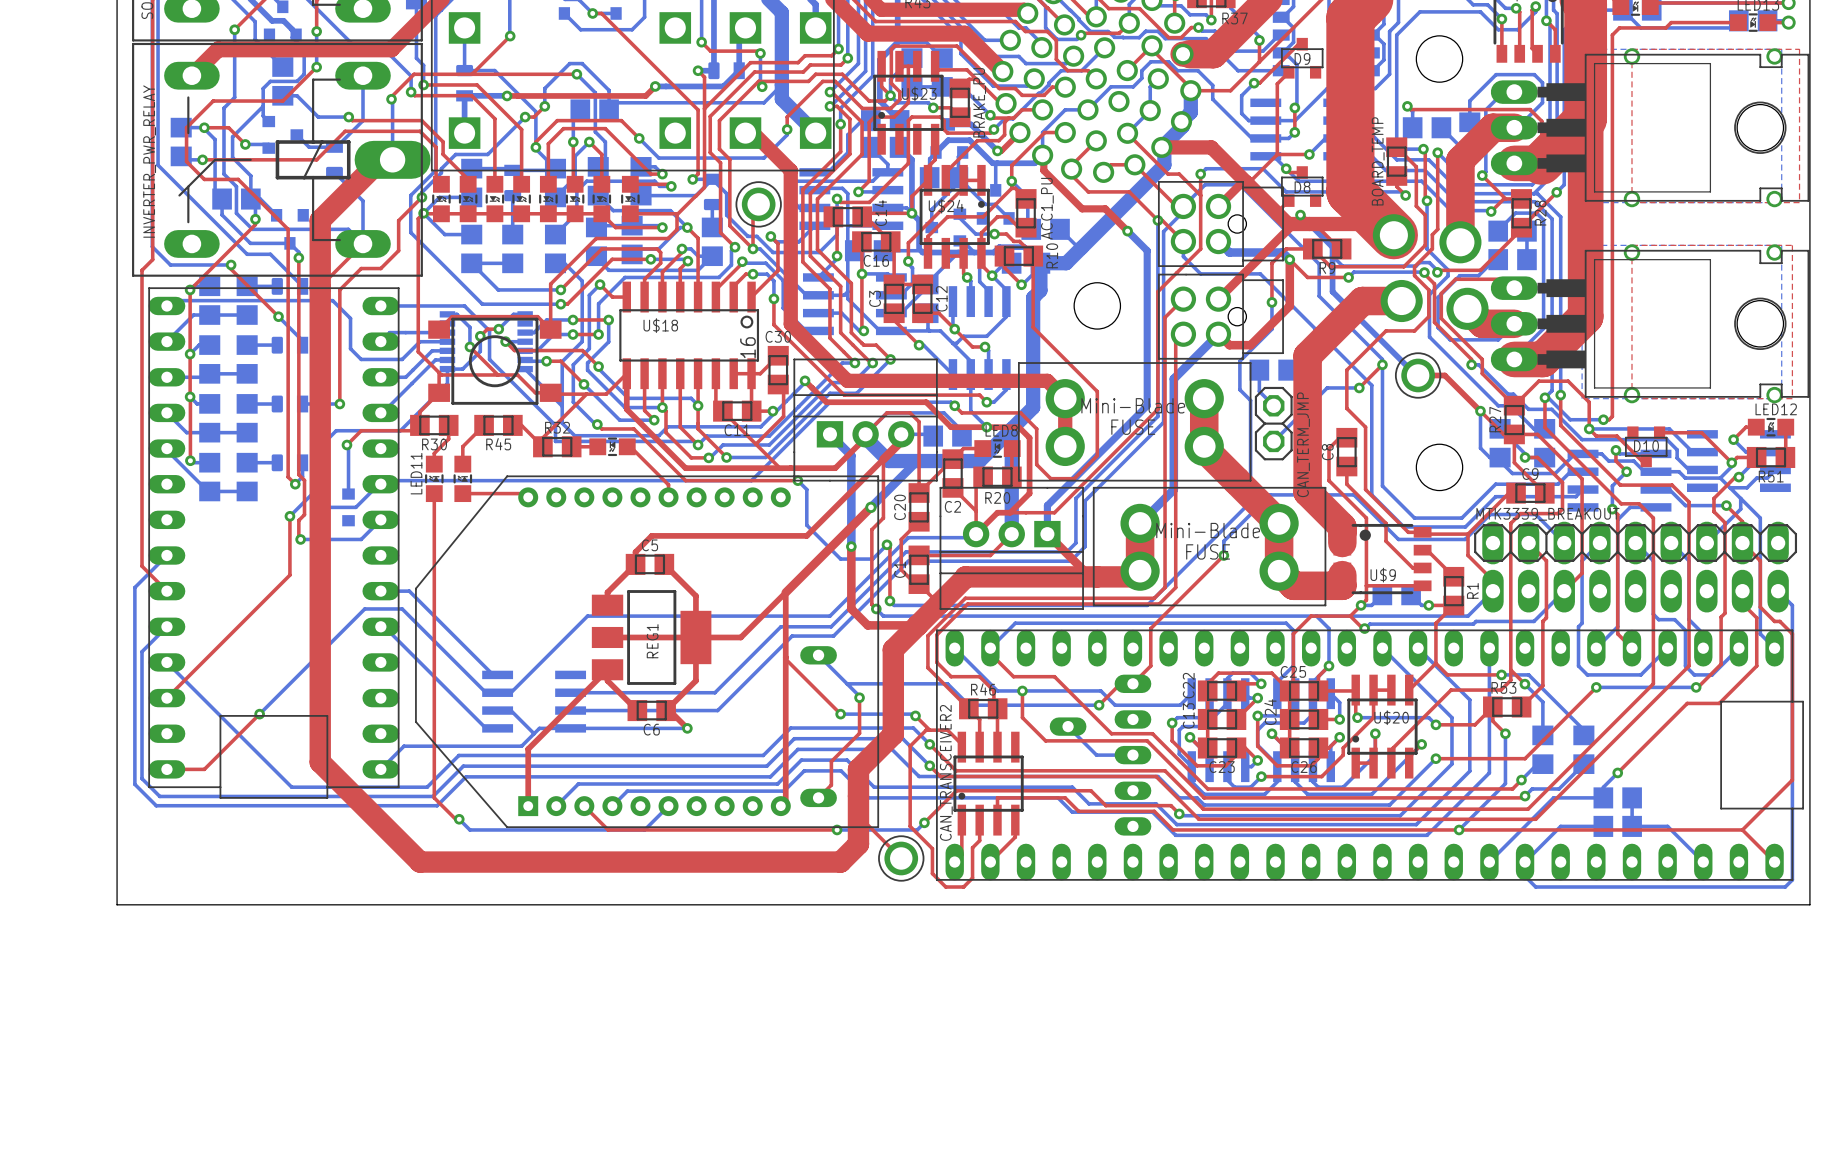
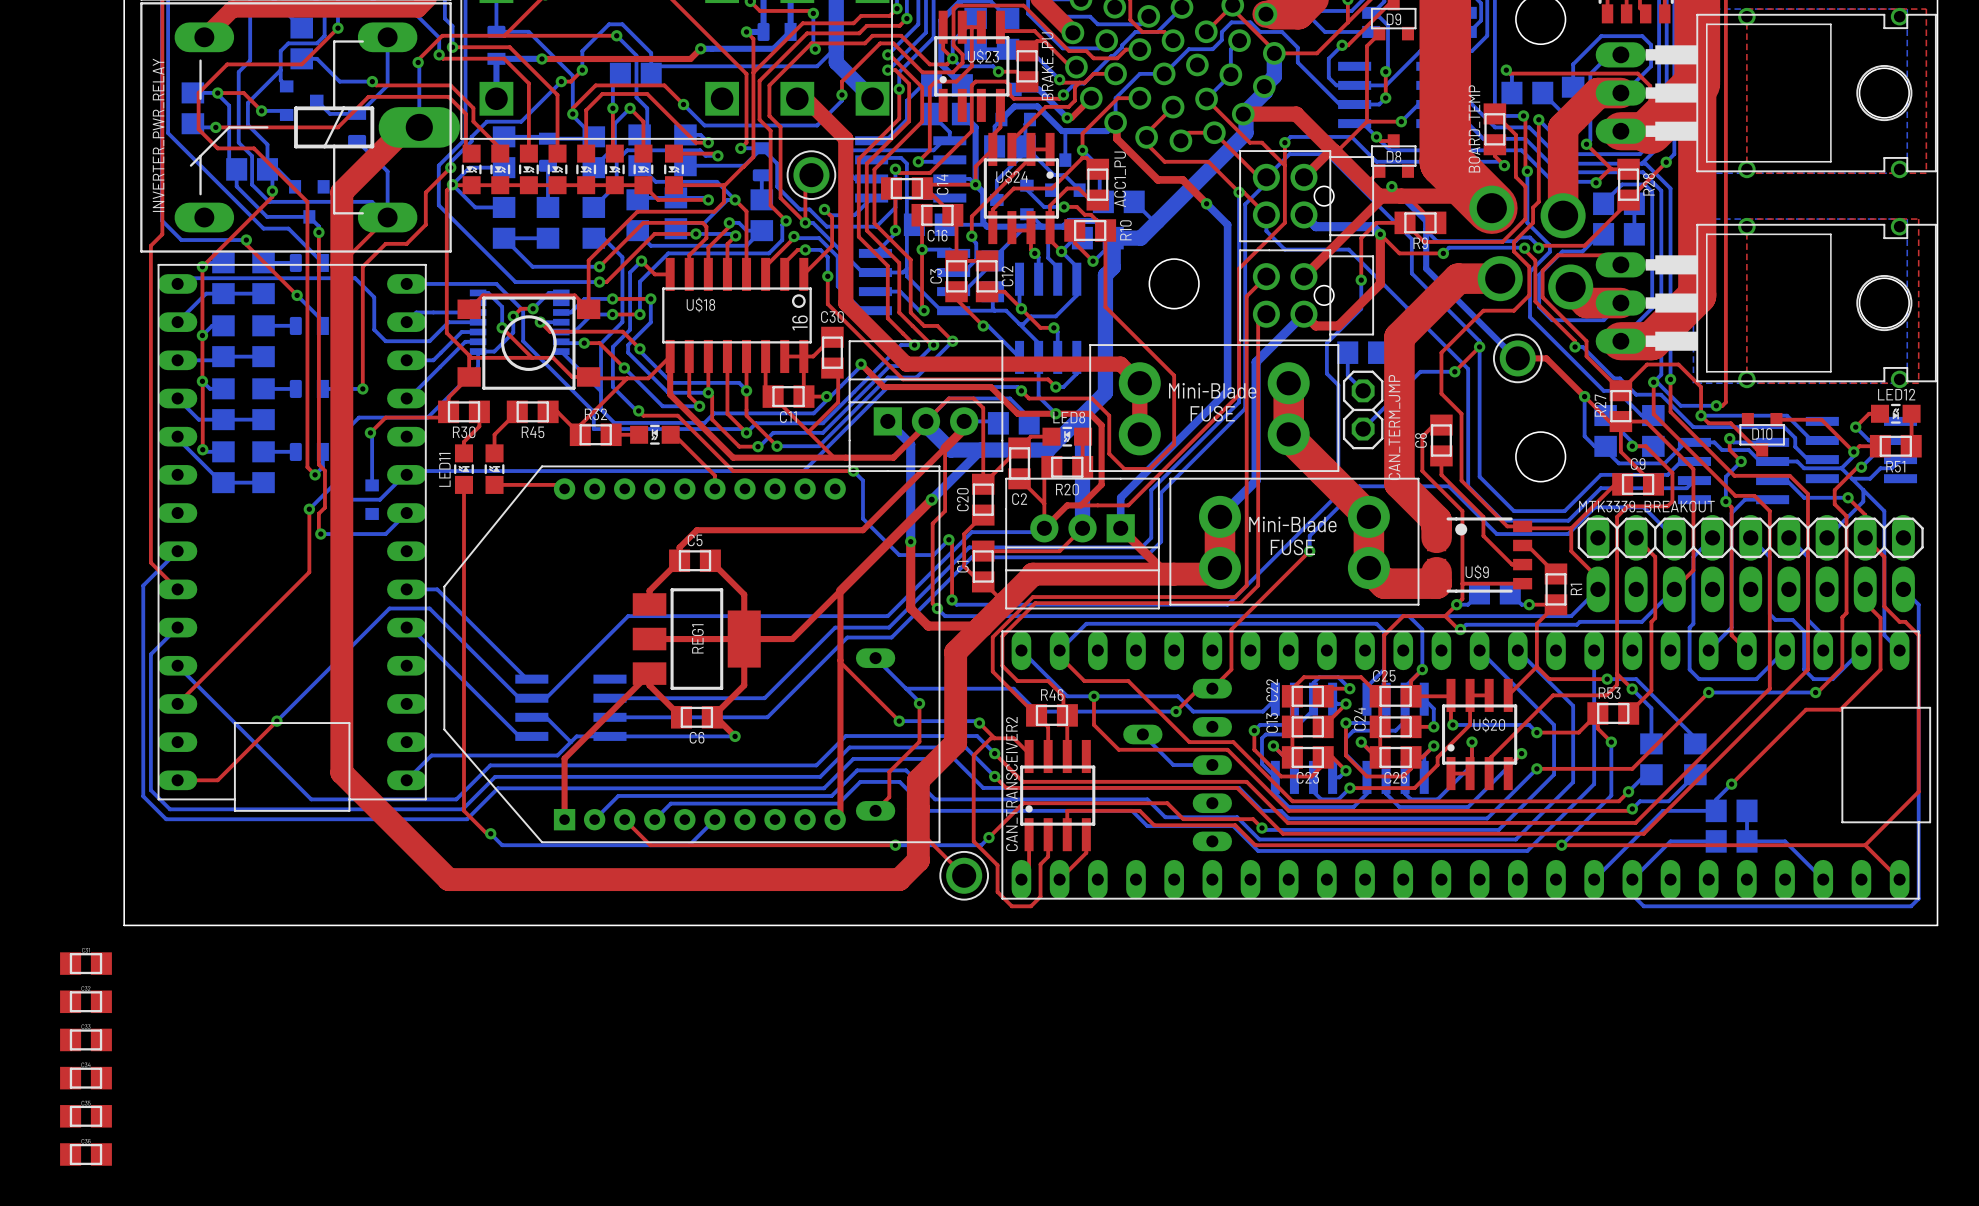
part: none -> (85, 963)
part: none -> (85, 1001)
part: none -> (85, 1039)
part: none -> (85, 1078)
part: none -> (85, 1116)
part: none -> (85, 1154)

